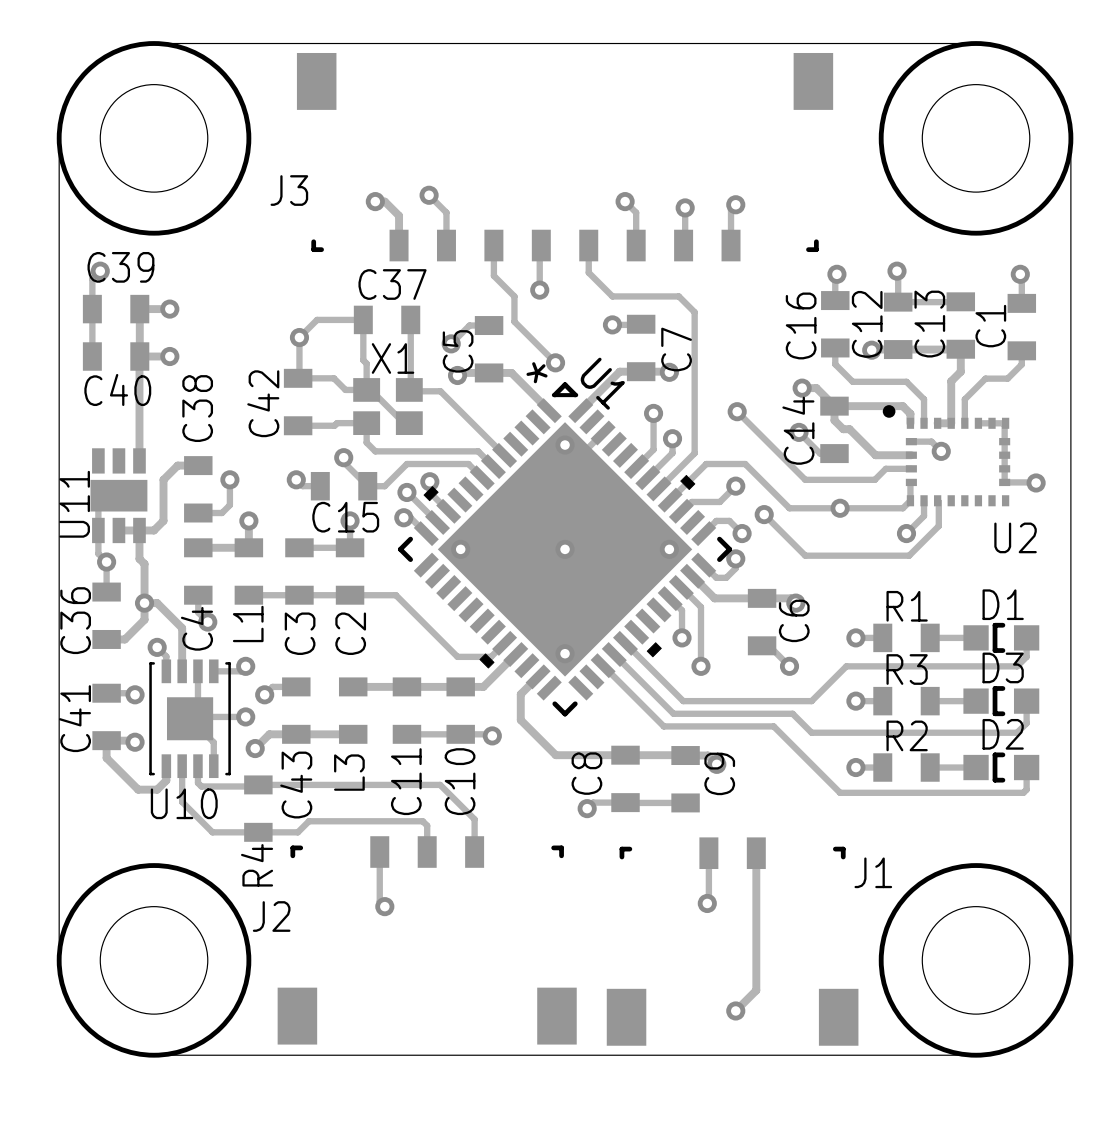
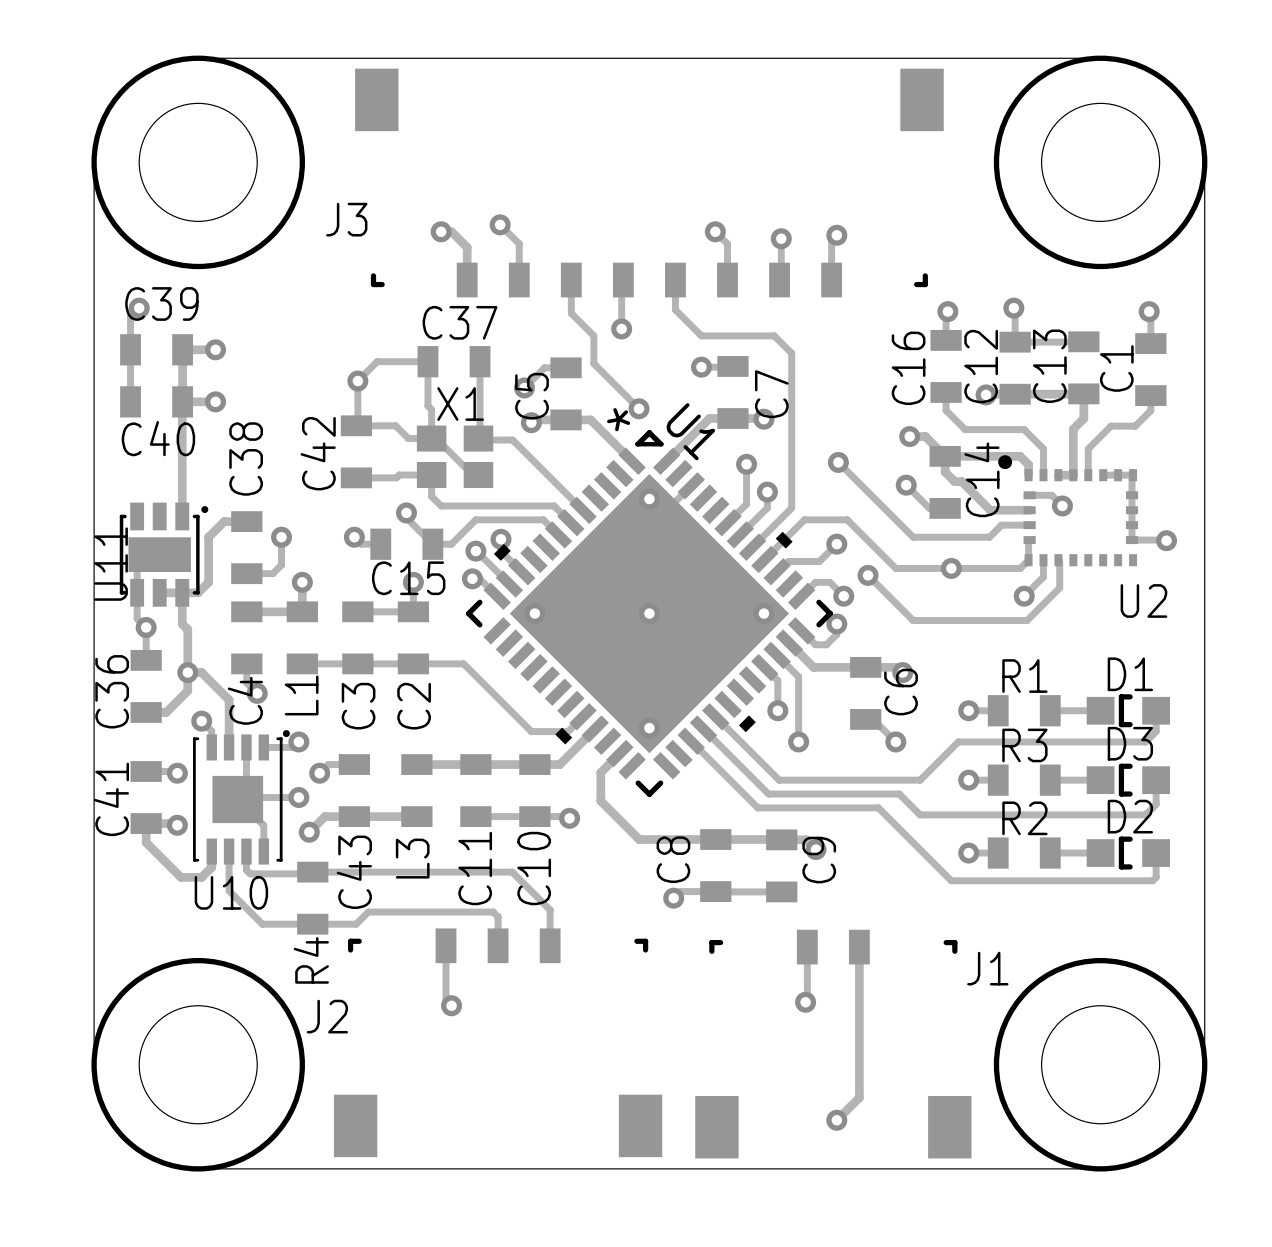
C14 name position: C14 (798, 430) -> C14 (981, 479)
U11 footprint: [90, 448, 148, 544] -> [119, 502, 209, 607]
U10 footprint: [149, 659, 231, 779] -> [193, 730, 290, 865]

